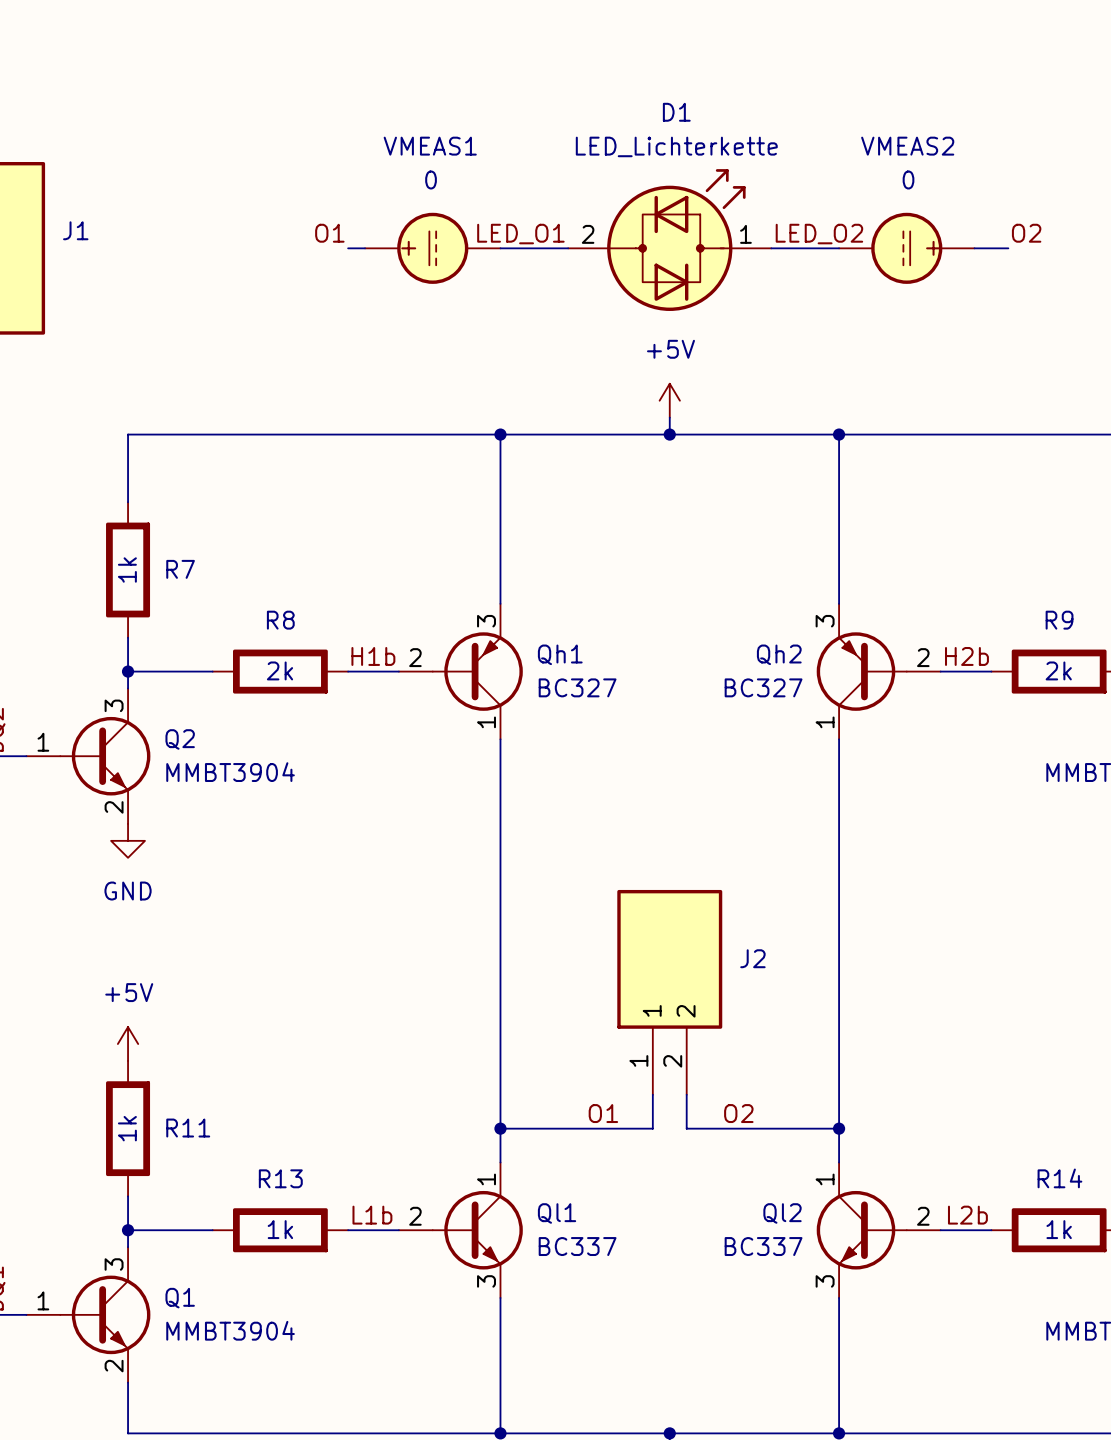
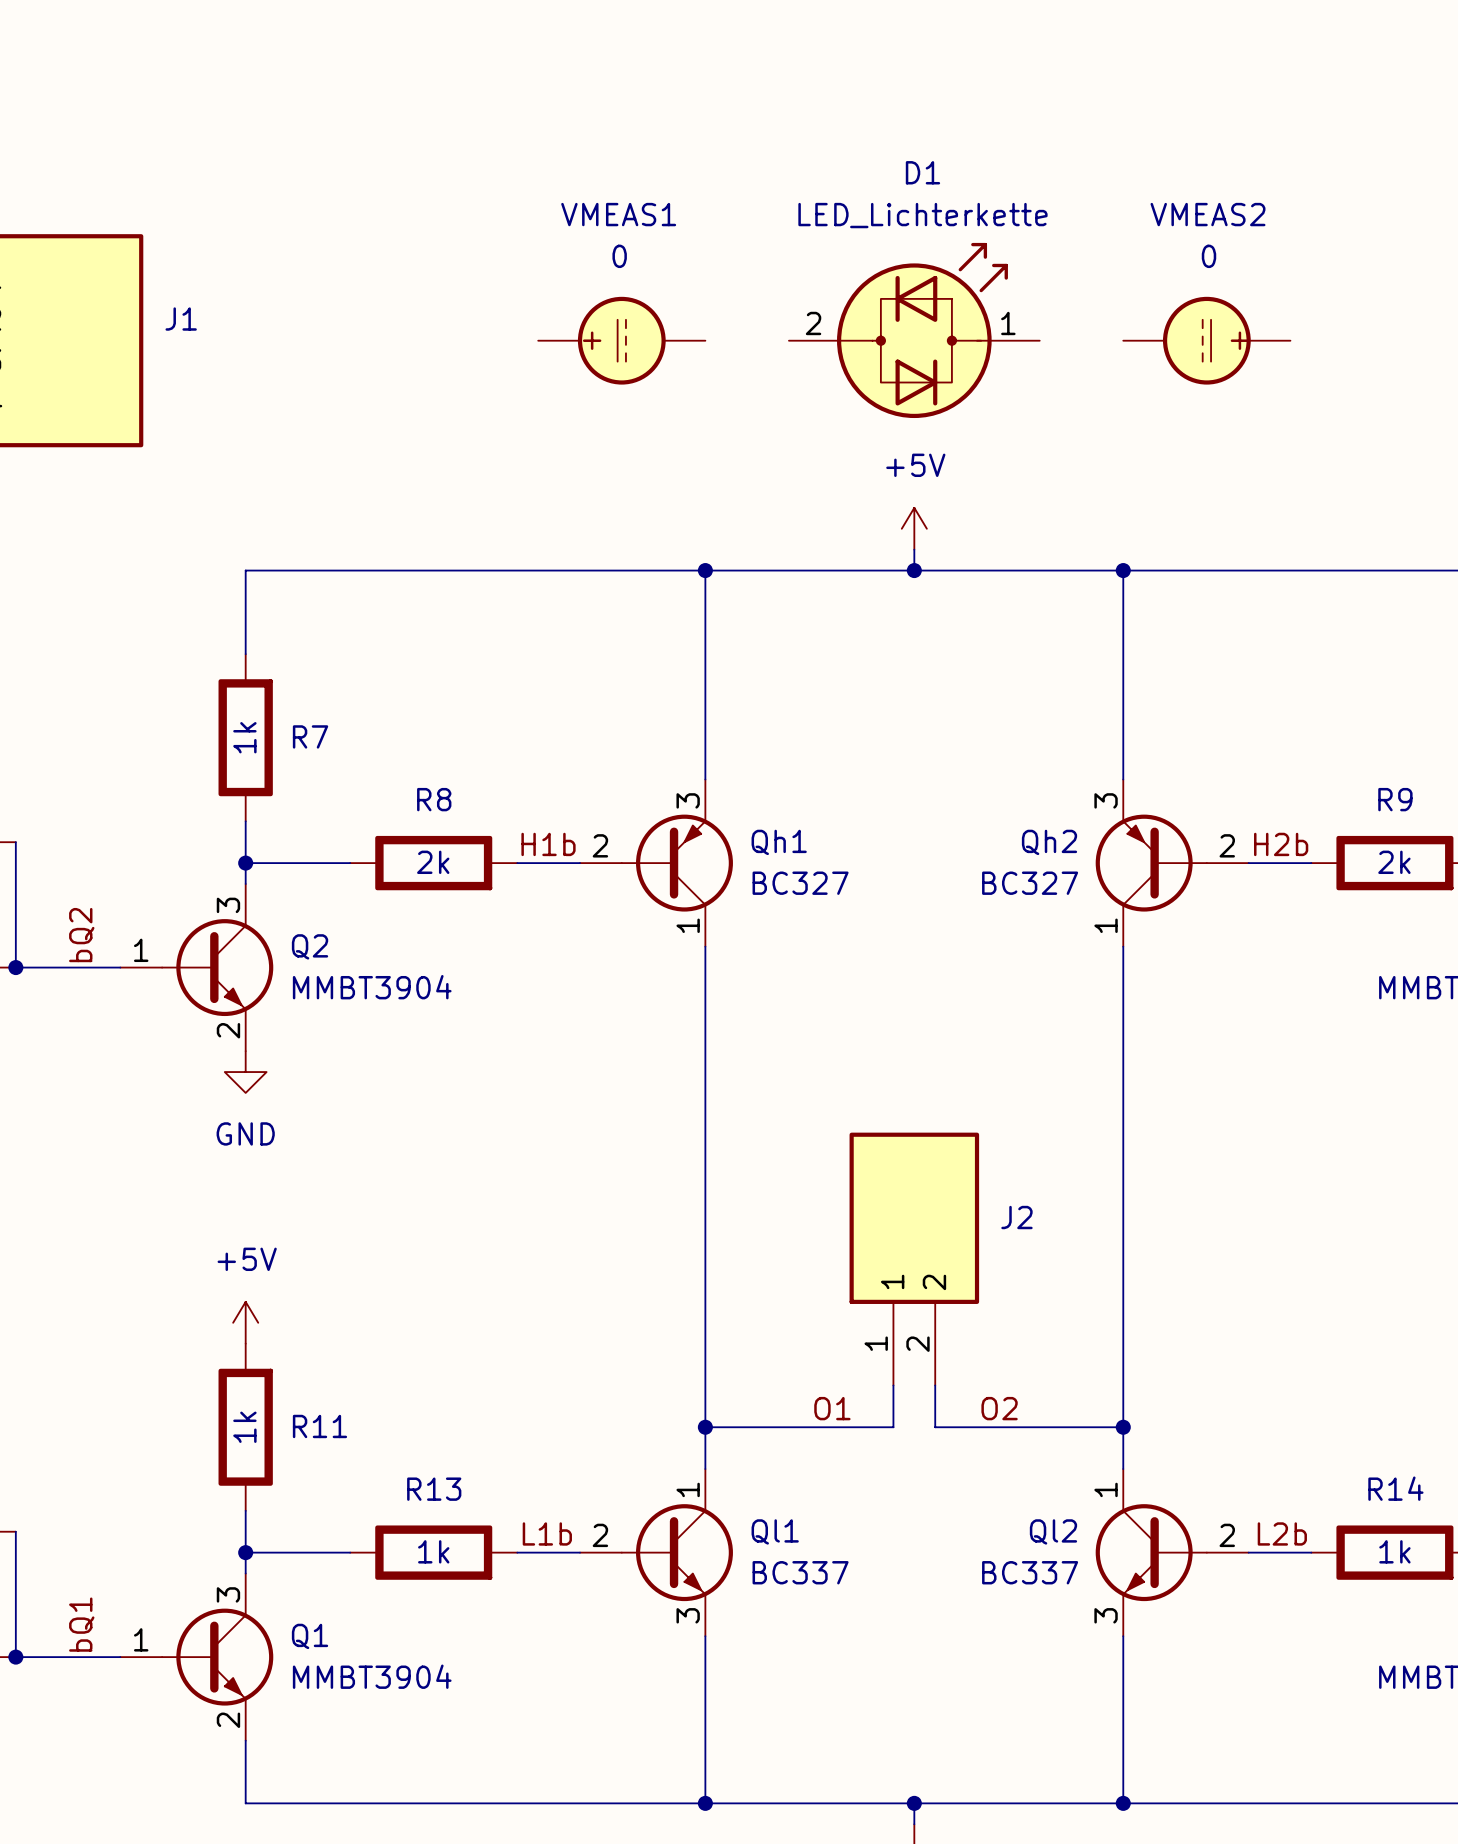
label: O1 (329, 233) -> none
label: O2 (1026, 233) -> none
label: LED_O1 (520, 234) -> none
label: LED_O2 (819, 234) -> none
wire: (348, 248) (365, 248) -> none
wire: (500, 248) (568, 248) -> none
wire: (771, 248) (839, 248) -> none
wire: (974, 248) (1008, 248) -> none

